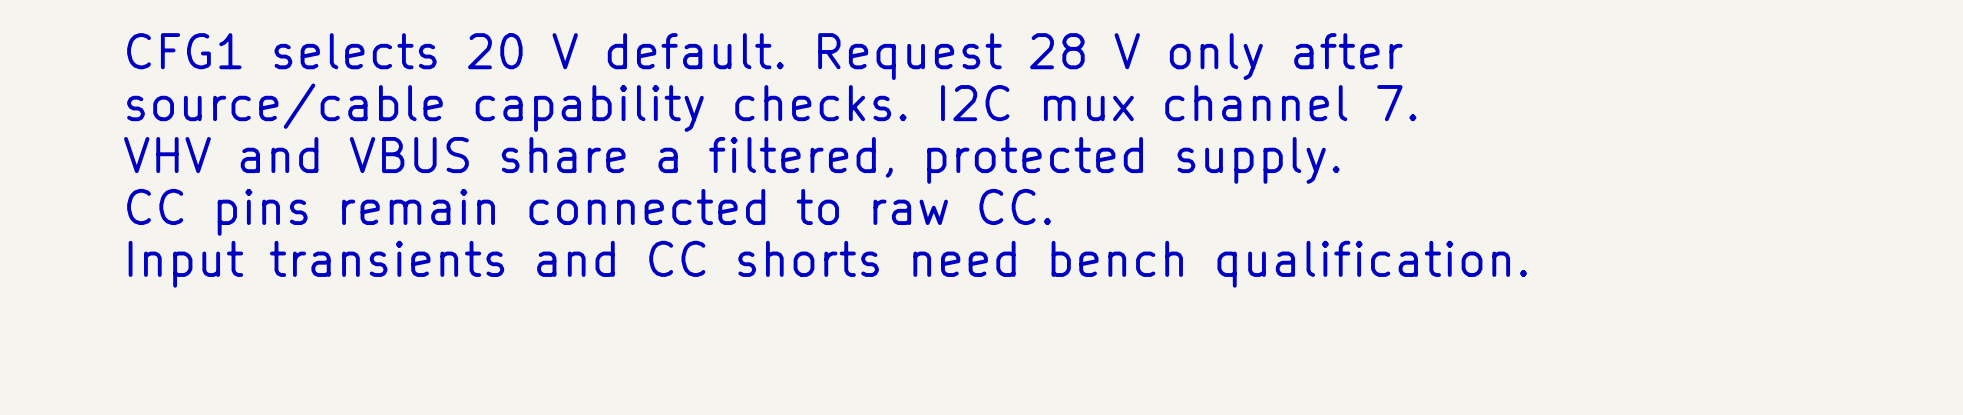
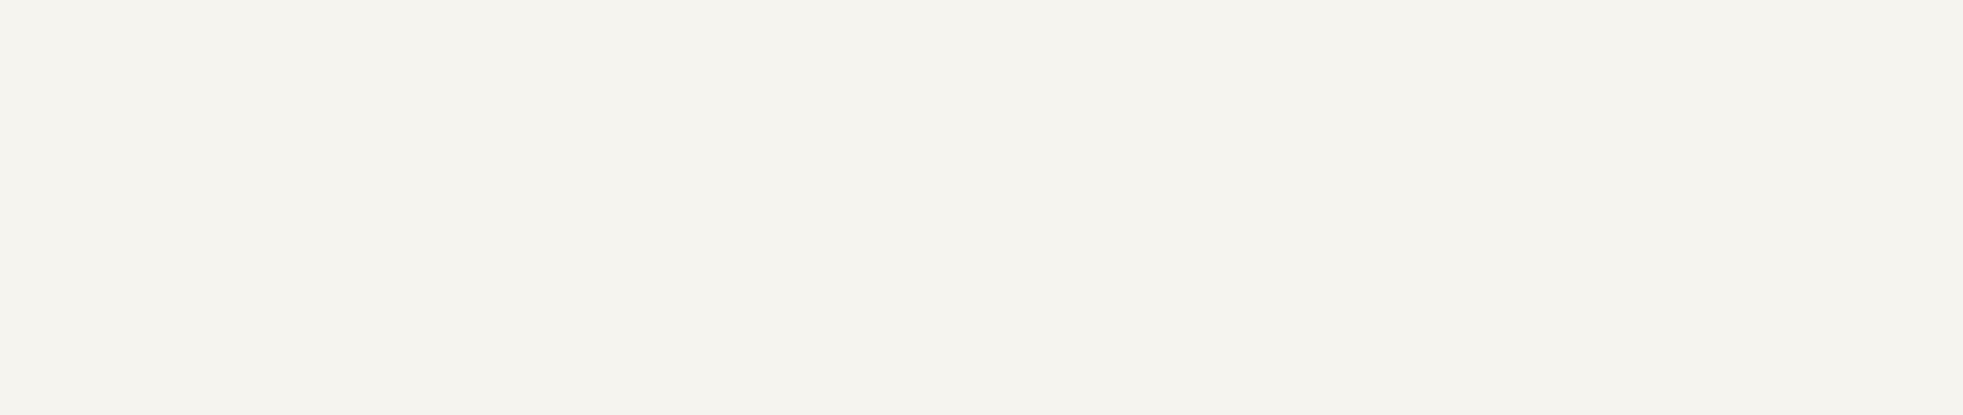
text: CFG1 selects 20 V default. Request 28 V only after (764, 56) -> none
text: source/cable capability checks. I2C mux channel 7. (771, 107) -> none
text: VHV and VBUS share a filtered, protected supply. (731, 160) -> none
text: CC pins remain connected to raw CC. (589, 212) -> none
text: Input transients and CC shorts need bench qualification. (827, 264) -> none

